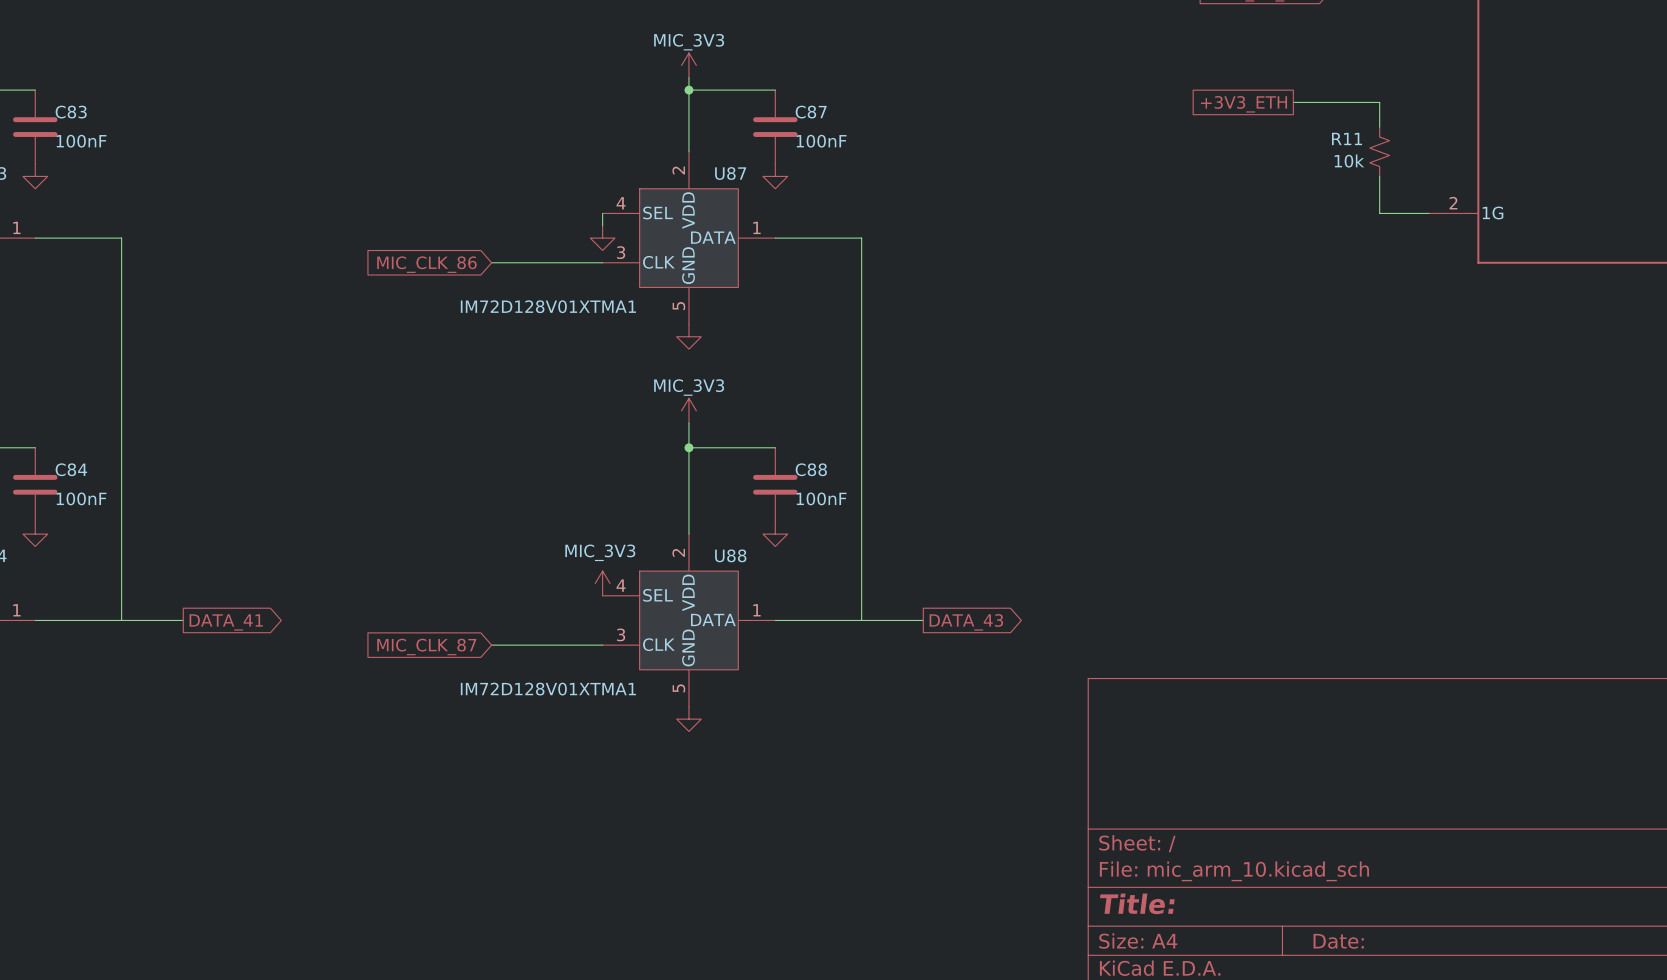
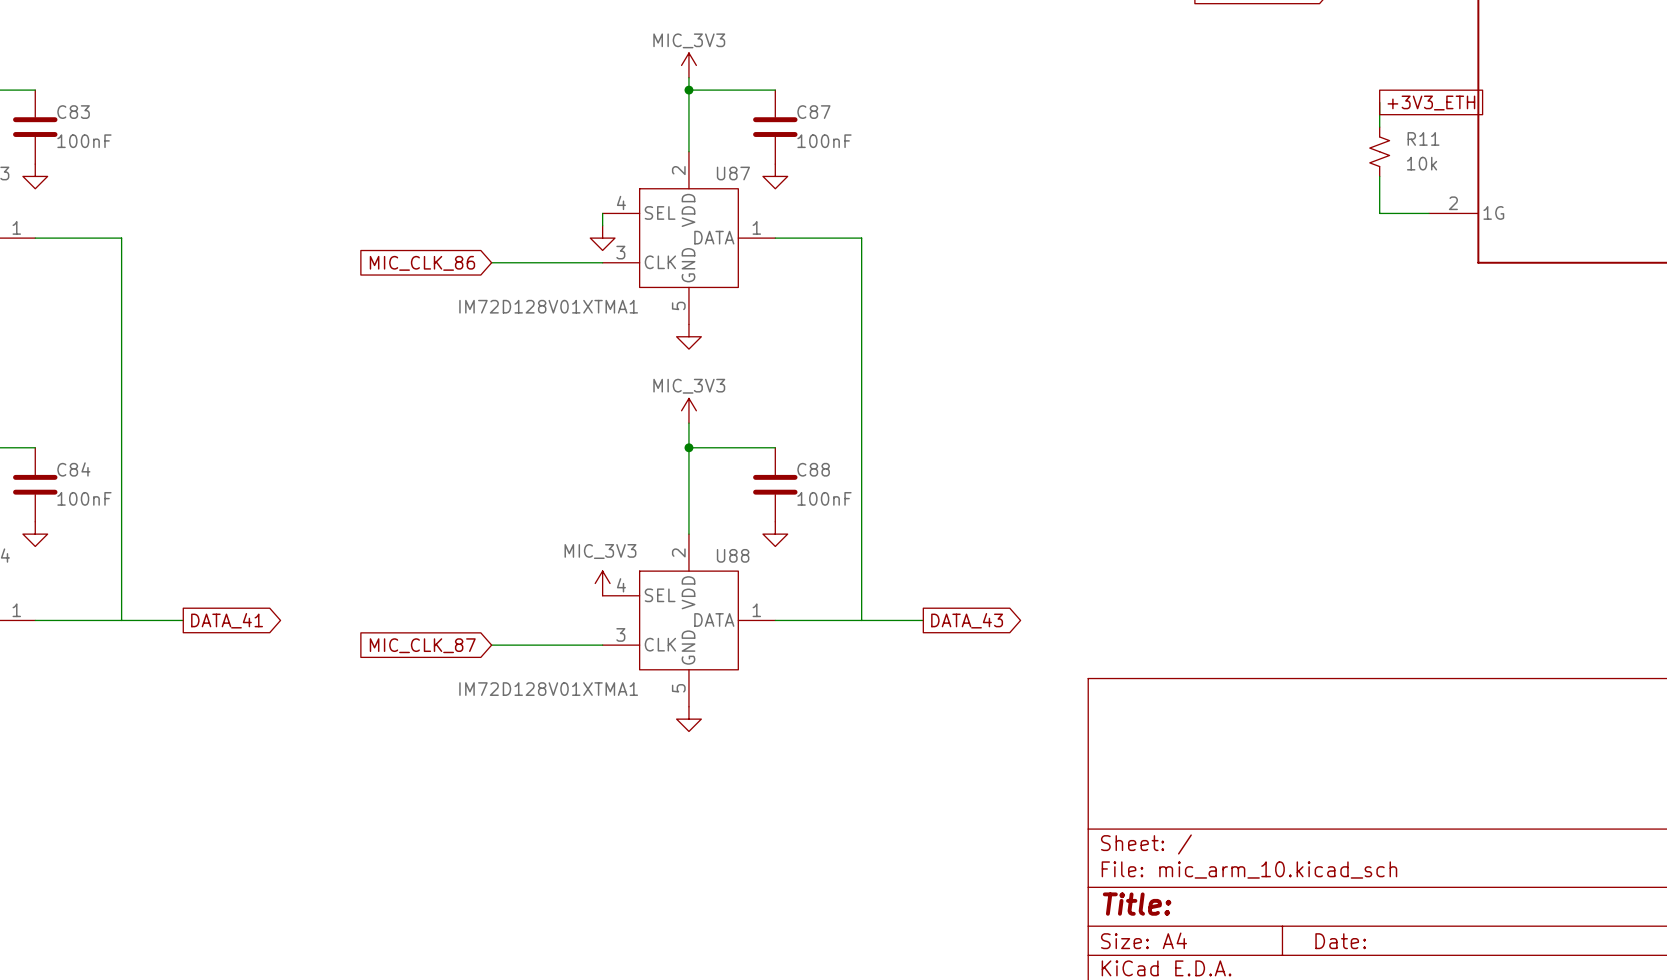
wire: (1293, 102) (1379, 102) -> none
global label rotation: 0° (1244, 104) -> 180° (1431, 103)
global label position: +3V3_ETH (1244, 104) -> +3V3_ETH (1431, 103)
R11 name position: R11 (1347, 138) -> R11 (1423, 138)
R11 value position: 10k (1349, 161) -> 10k (1422, 163)

